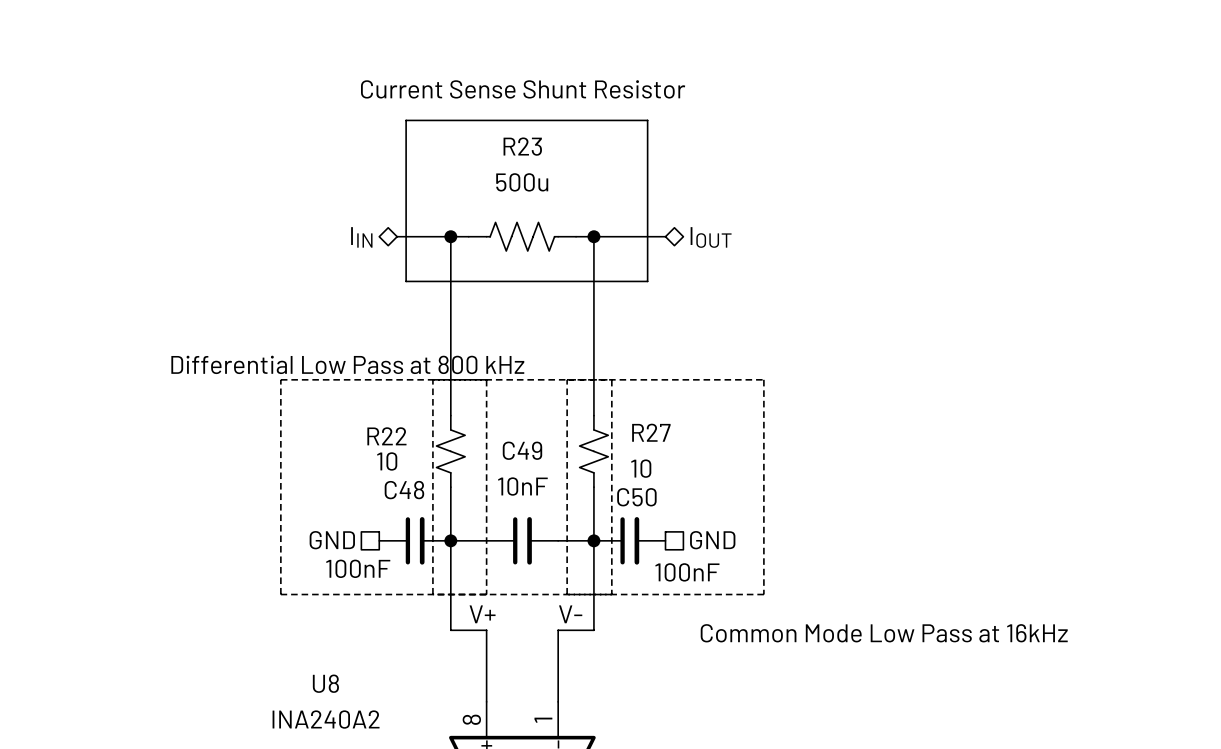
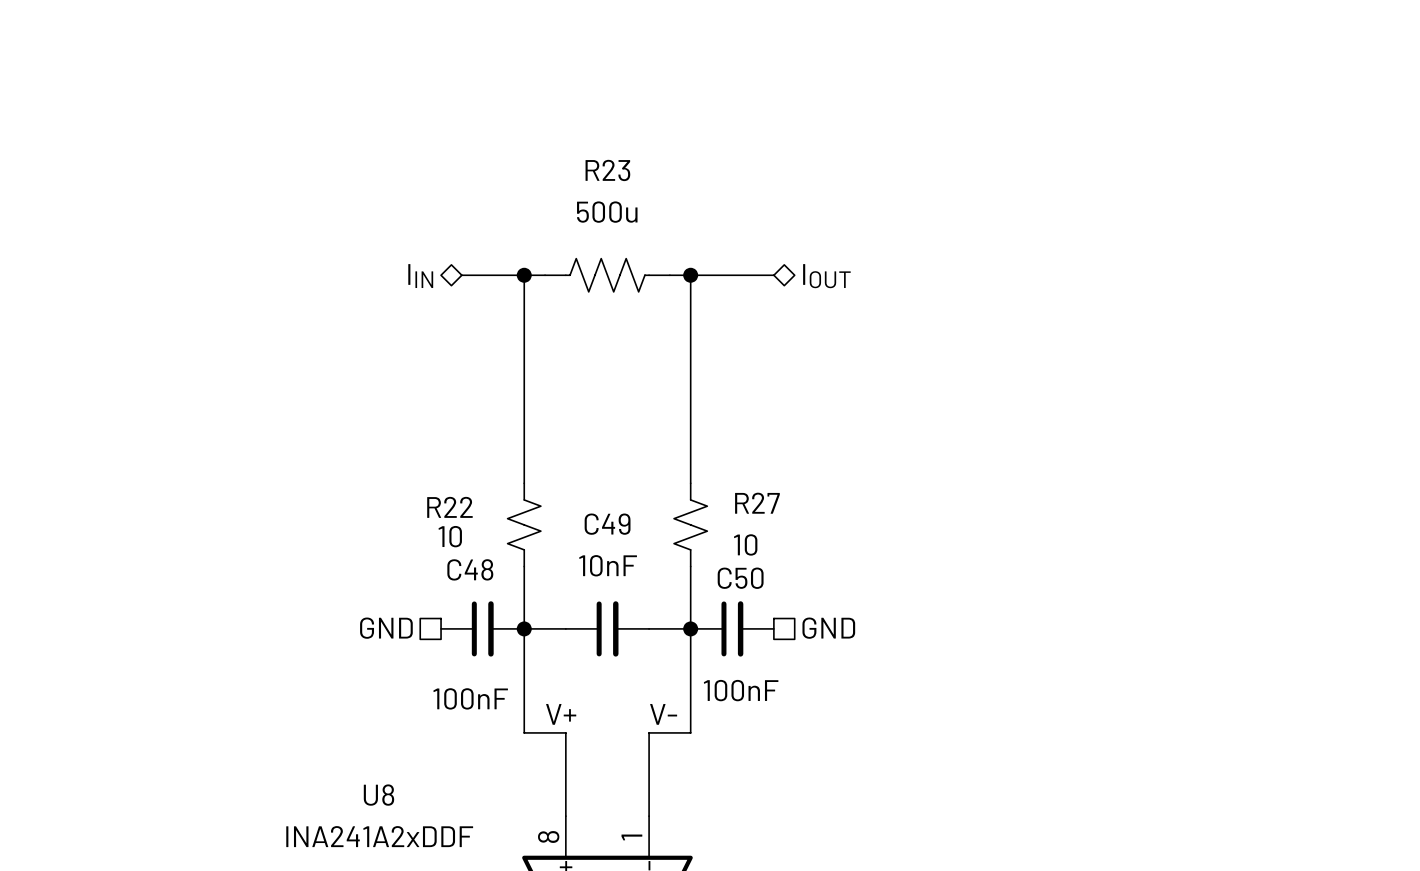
text: Current Sense Shunt Resistor (523, 89) -> none
line: (406, 120) (647, 120) (647, 281) (406, 281) (406, 120) -> none
text: Differential Low Pass at 800 kHz (347, 364) -> none
line: (280, 379) (763, 379) (763, 594) (280, 594) (280, 379) -> none
line: (432, 379) (432, 594) -> none
line: (486, 379) (486, 594) -> none
line: (567, 379) (567, 594) -> none
line: (611, 379) (611, 594) -> none
C48 value position: 100nF (358, 568) -> 100nF (470, 698)
C50 value position: 100nF (687, 572) -> 100nF (741, 690)
text: Common Mode Low Pass at 16kHz (884, 633) -> none
U8 value: INA240A2 (326, 719) -> INA241A2xDDF (379, 836)

